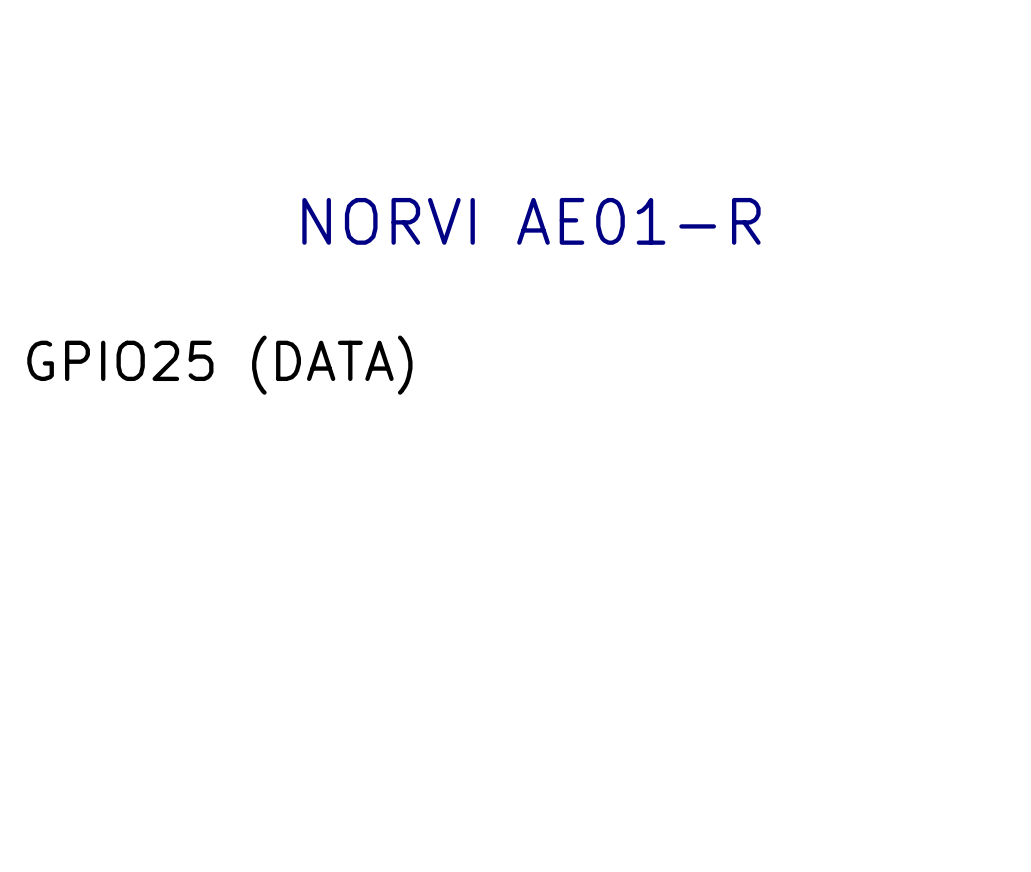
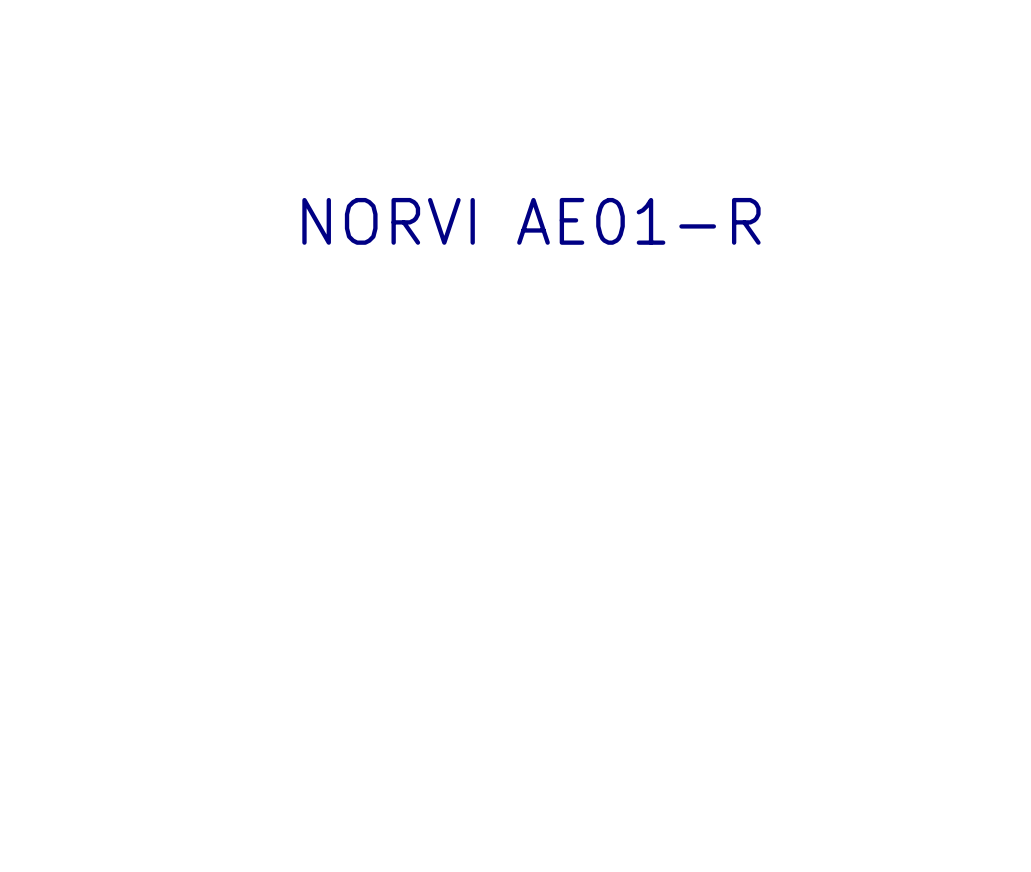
label: GPIO25 (DATA) (219, 365) -> none

